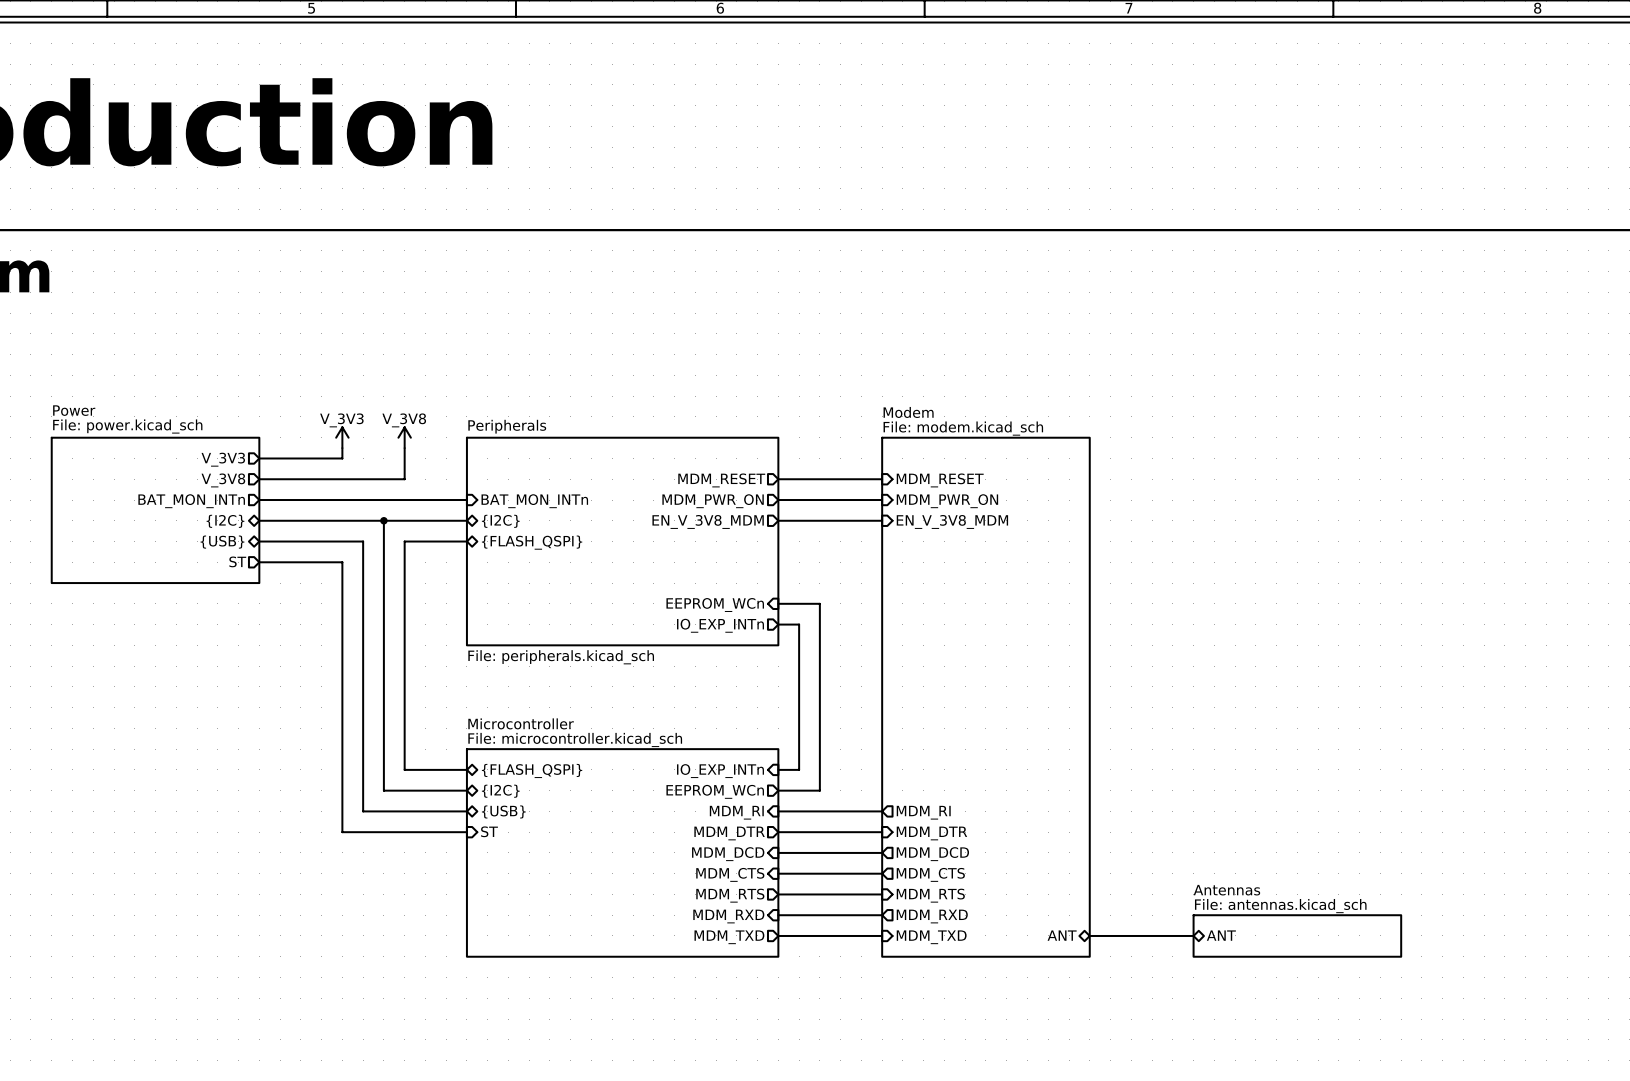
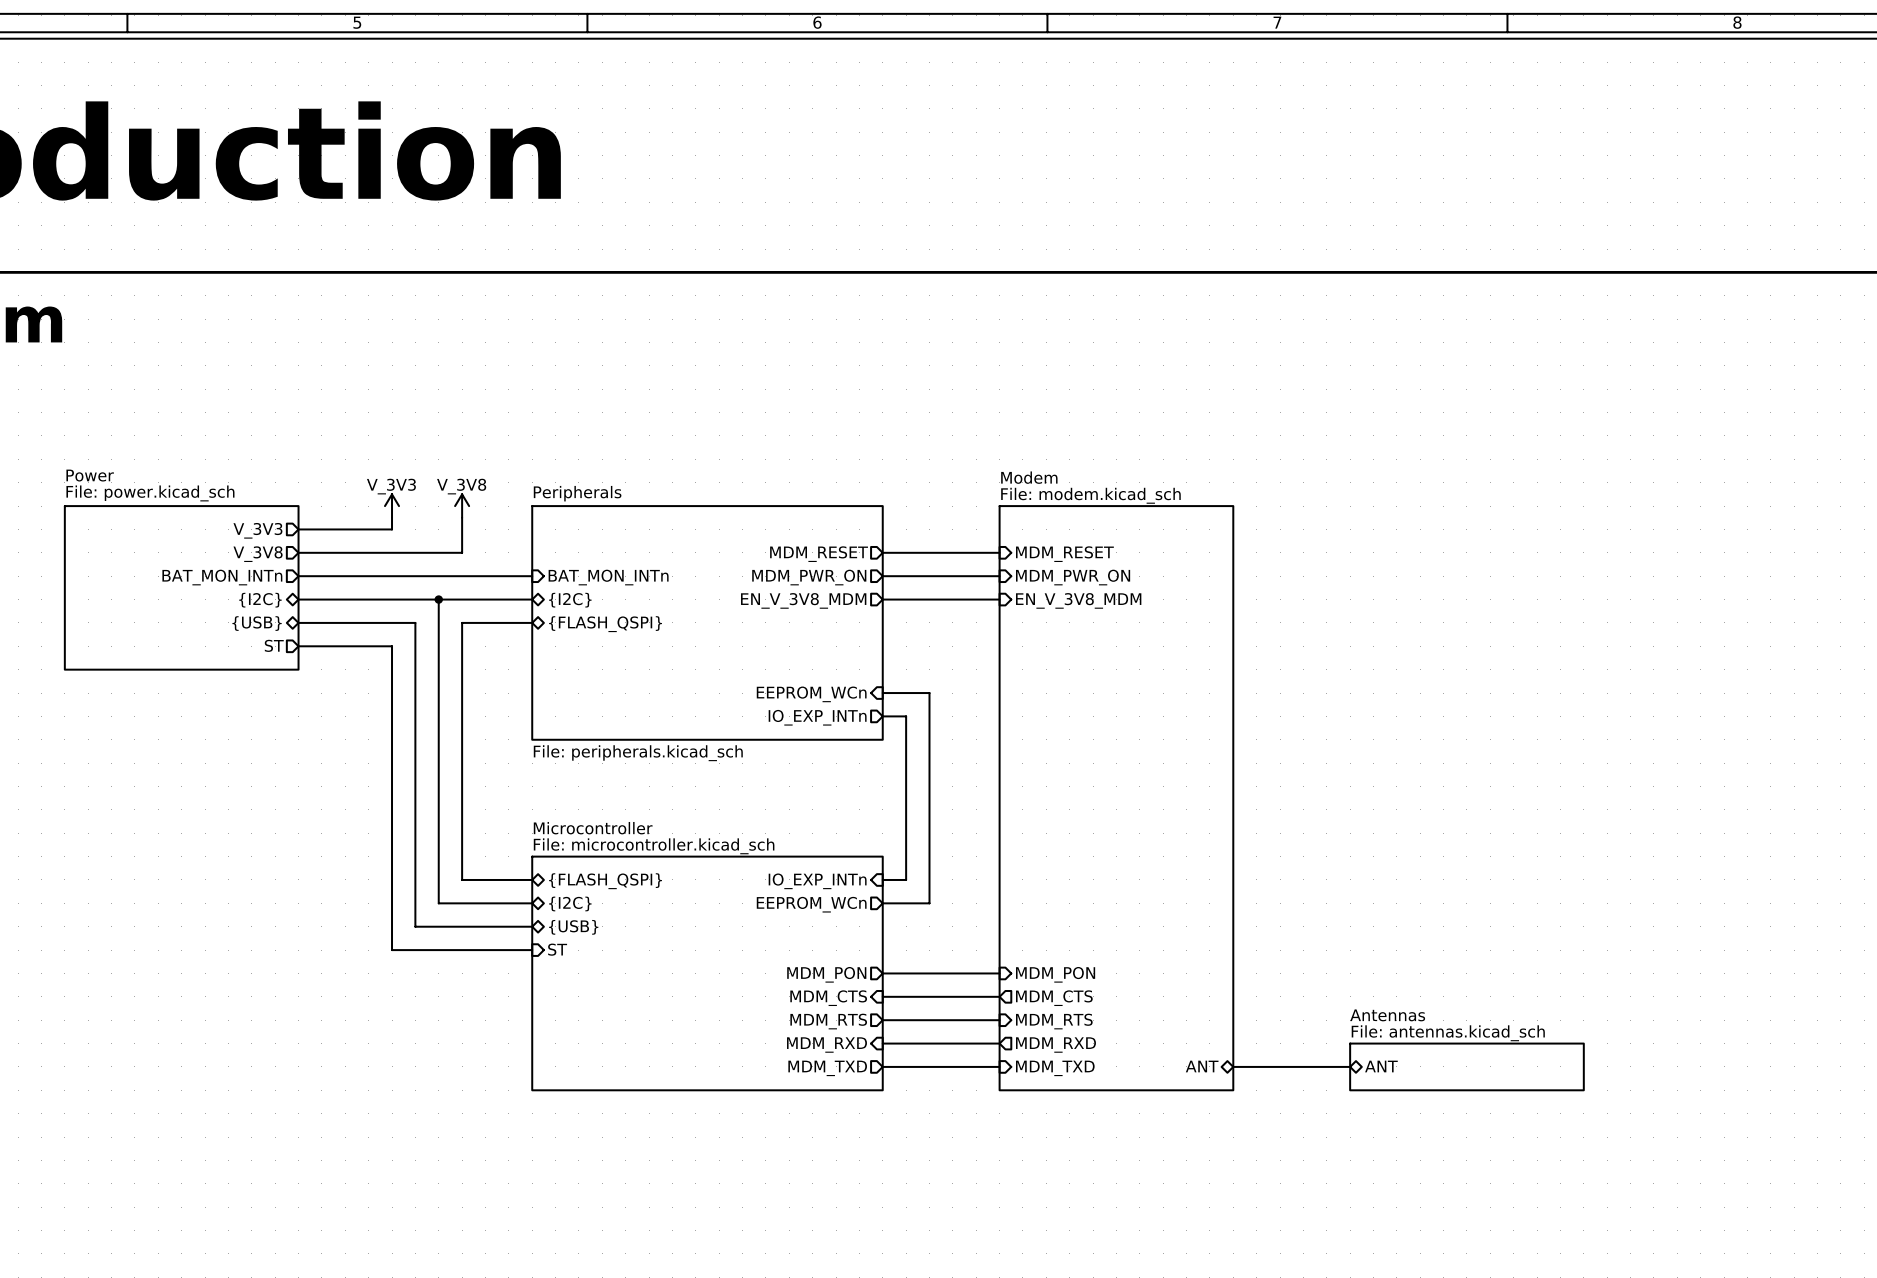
wire: (778, 811) (882, 811) -> none
sheet pin: MDM_RI (736, 812) -> none
sheet pin: MDM_RI (923, 812) -> none
wire: (778, 832) (882, 832) -> none
sheet pin: MDM_DTR (729, 833) -> none
sheet pin: MDM_DTR (931, 833) -> none
sheet pin shape: input (728, 854) -> output (826, 974)
sheet pin: MDM_DCD (728, 854) -> MDM_PON (826, 974)
sheet pin shape: output (932, 854) -> input (1055, 974)
sheet pin: MDM_DCD (932, 854) -> MDM_PON (1055, 974)

